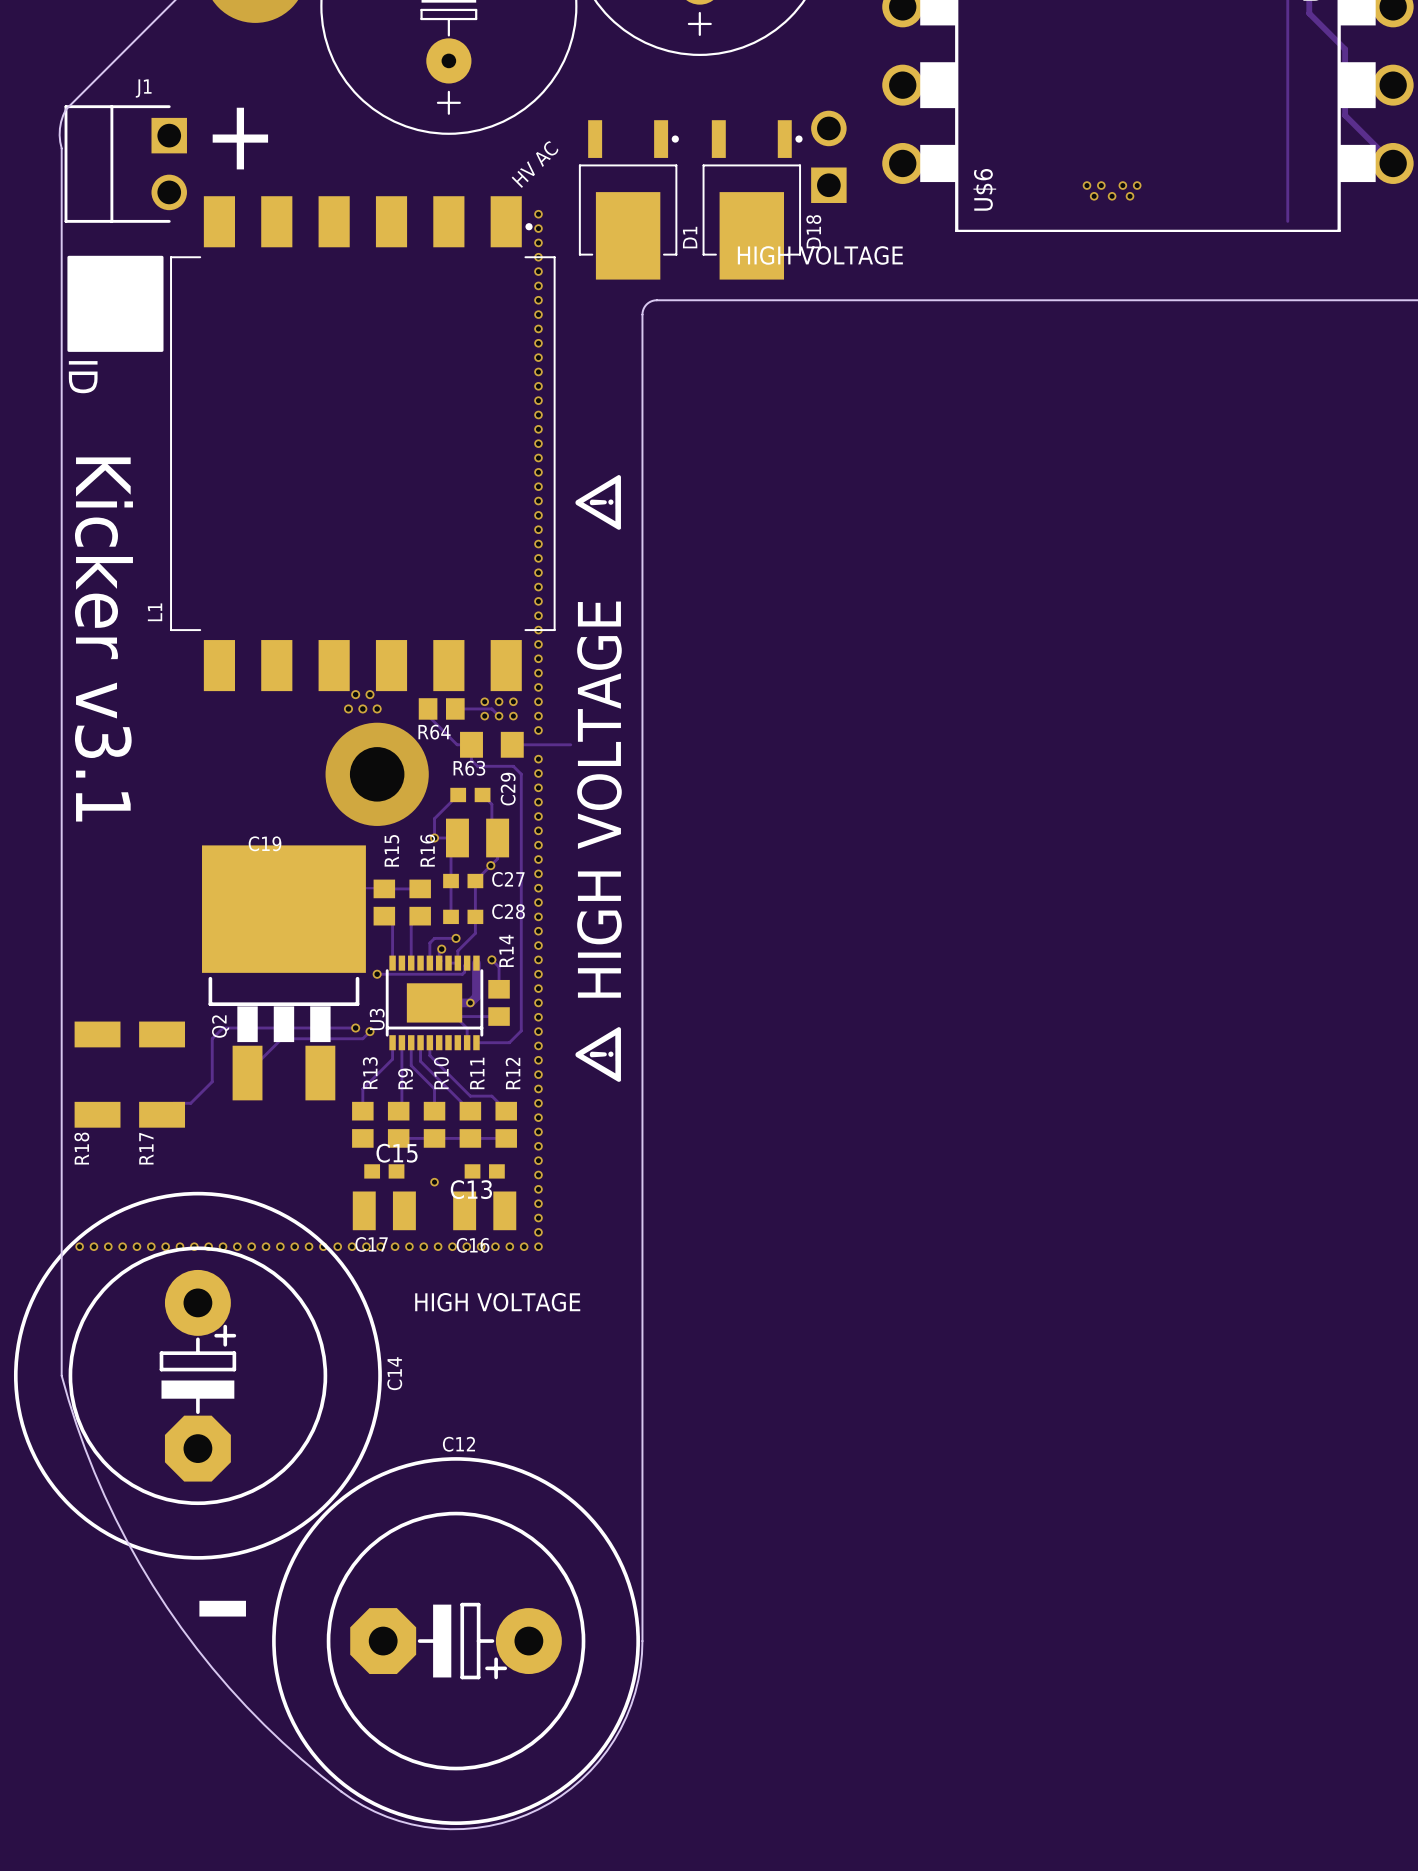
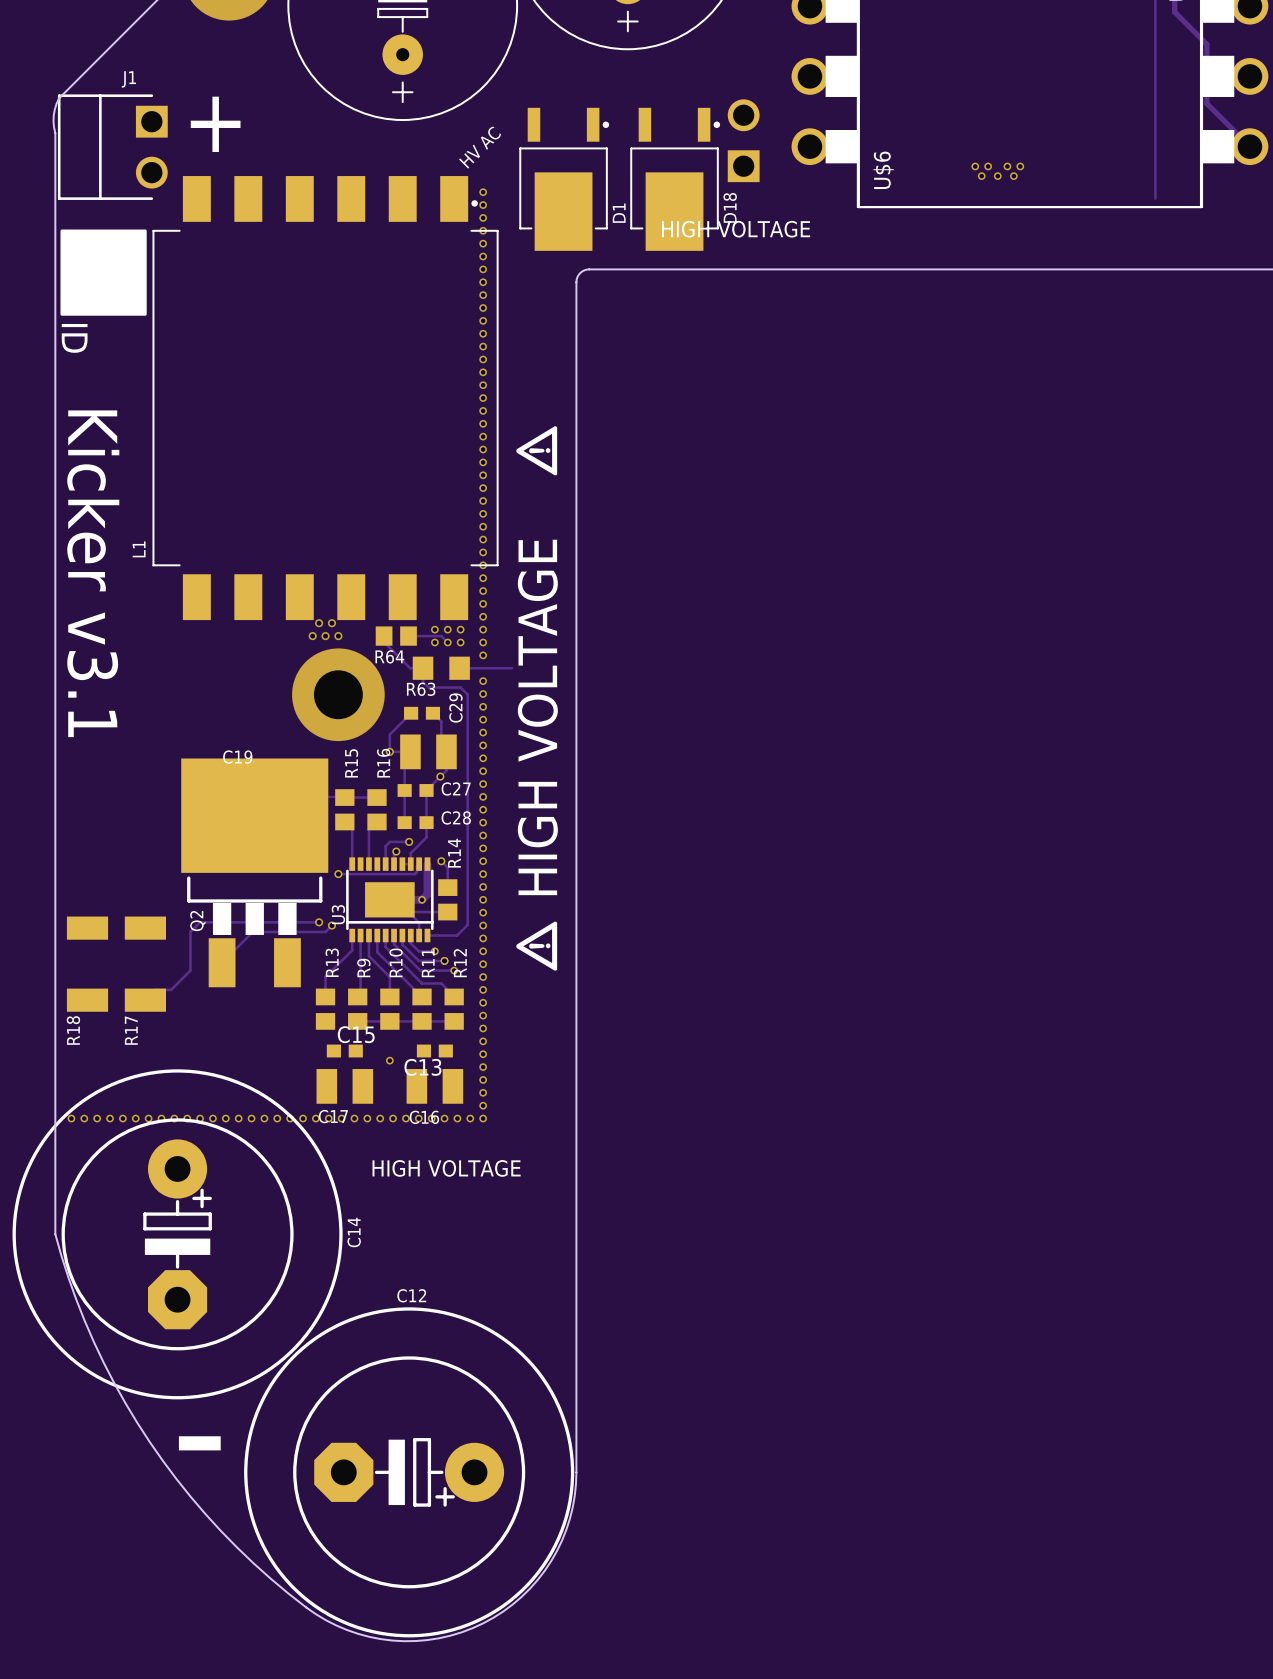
track: none -> (394, 935) (394, 944) (420, 970) (454, 970)
track: none -> (402, 935) (402, 944) (418, 960) (444, 960)
track: none -> (410, 935) (410, 943) (418, 951) (434, 951)
via: none -> (434, 951)
via: none -> (444, 960)
via: none -> (454, 970)

